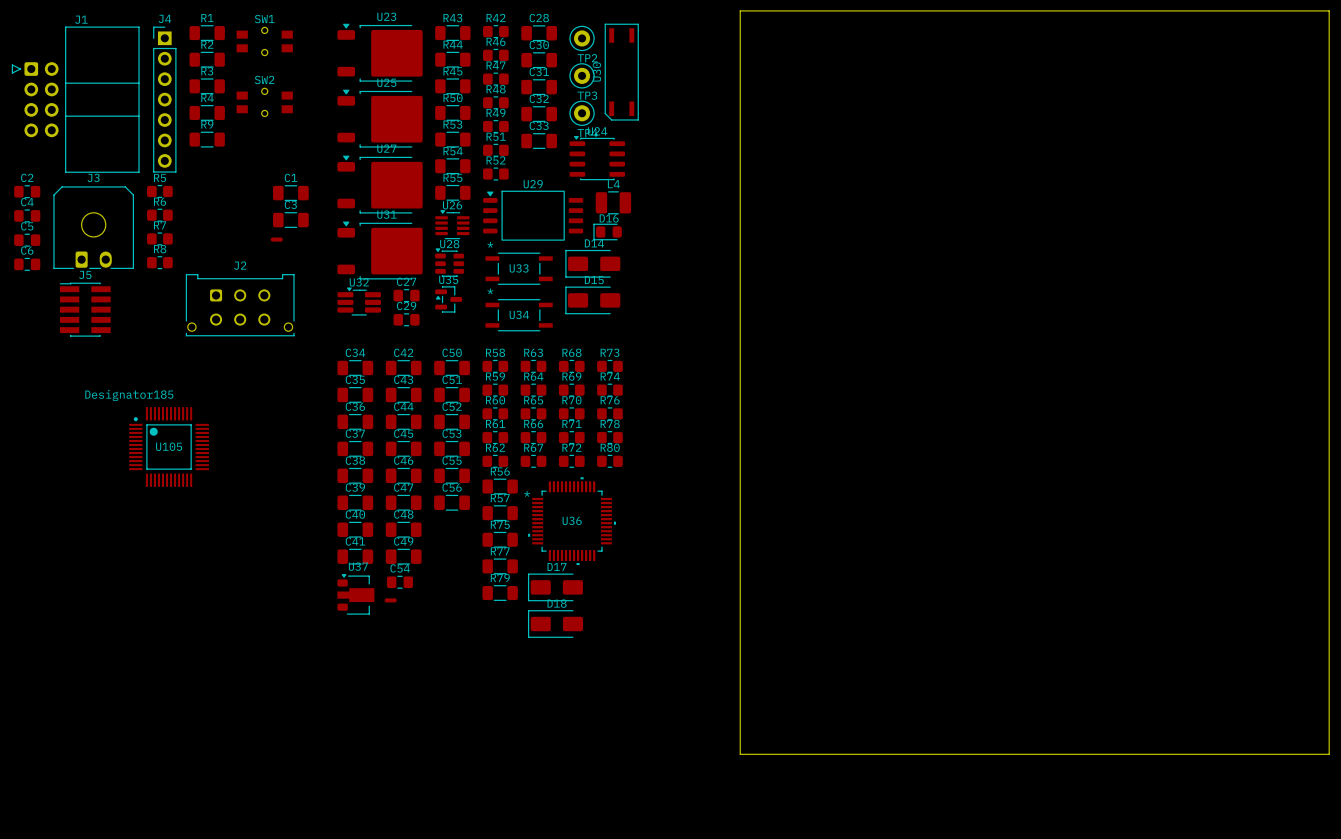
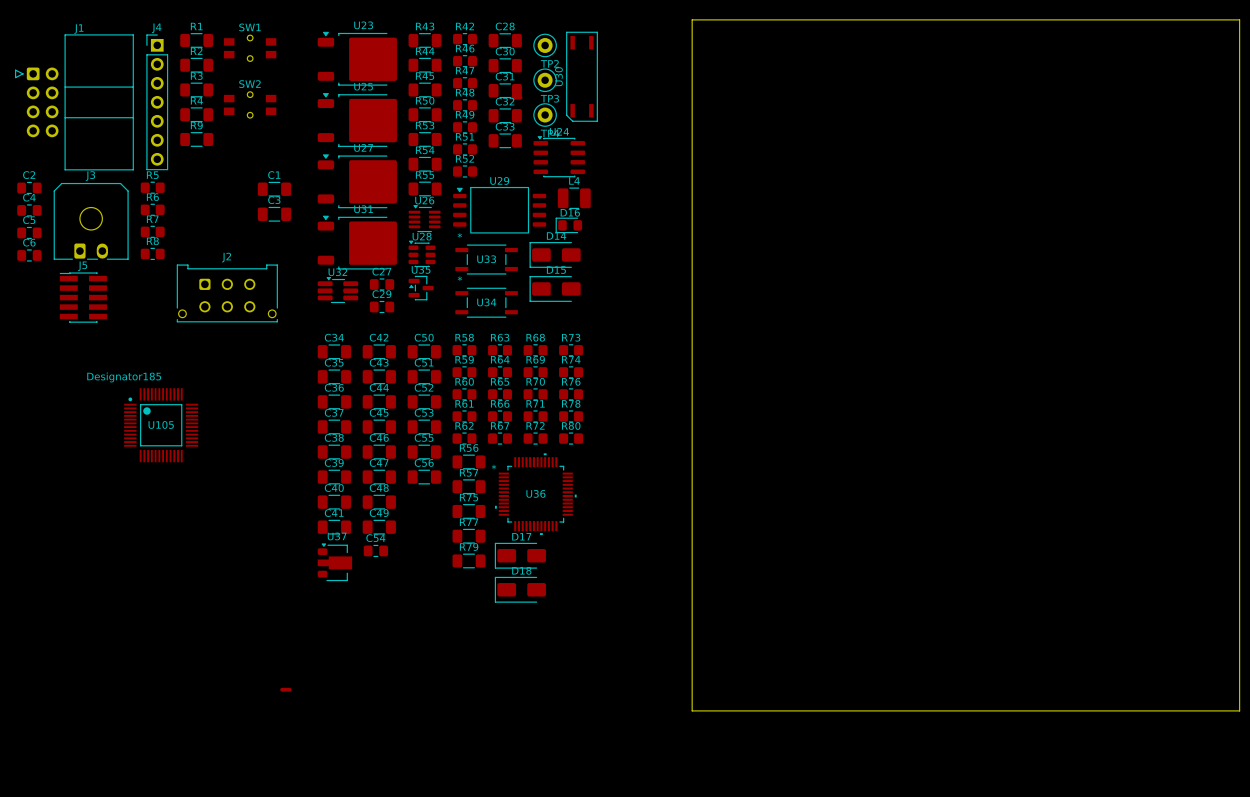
part: none -> (516, 97)
part: (276, 239) -> none
part position: (390, 600) -> (285, 689)

